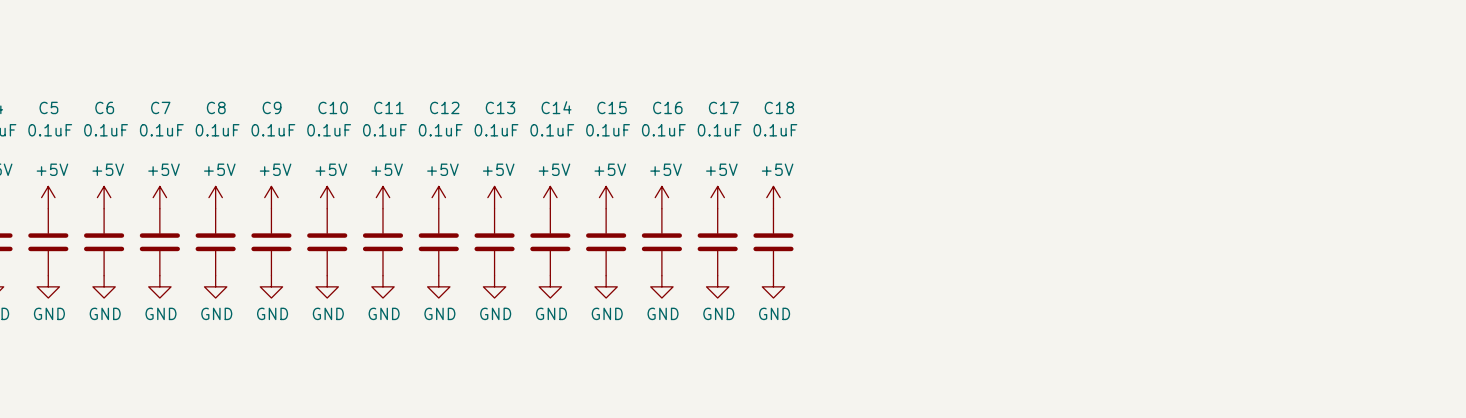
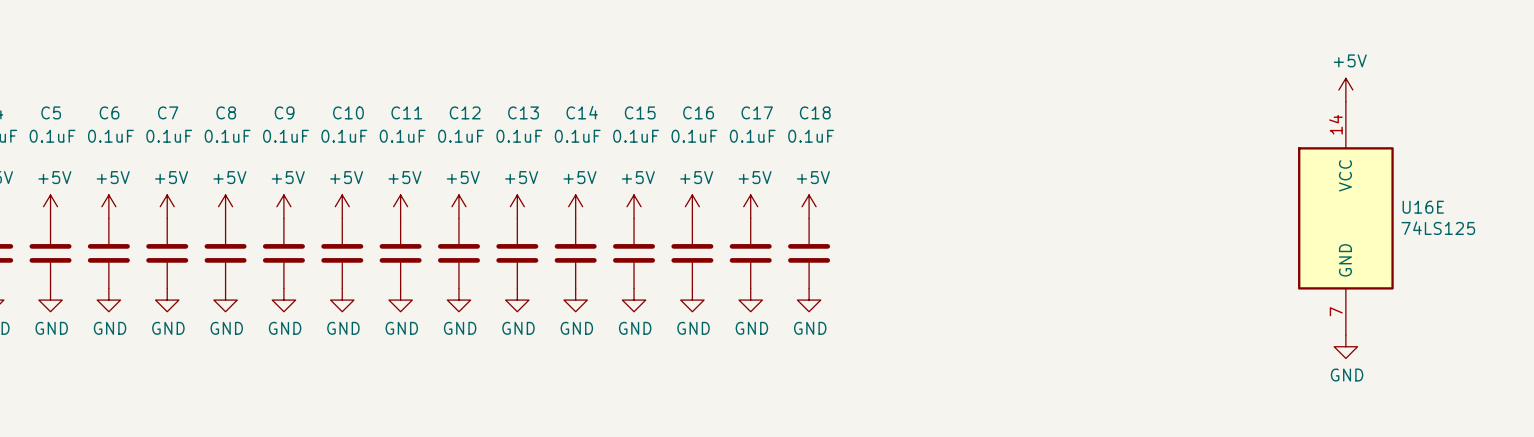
power symbol: none -> +5V (1345, 90)
U16E: none -> 74LS125 (1345, 218)
power symbol: none -> GND (1345, 346)

